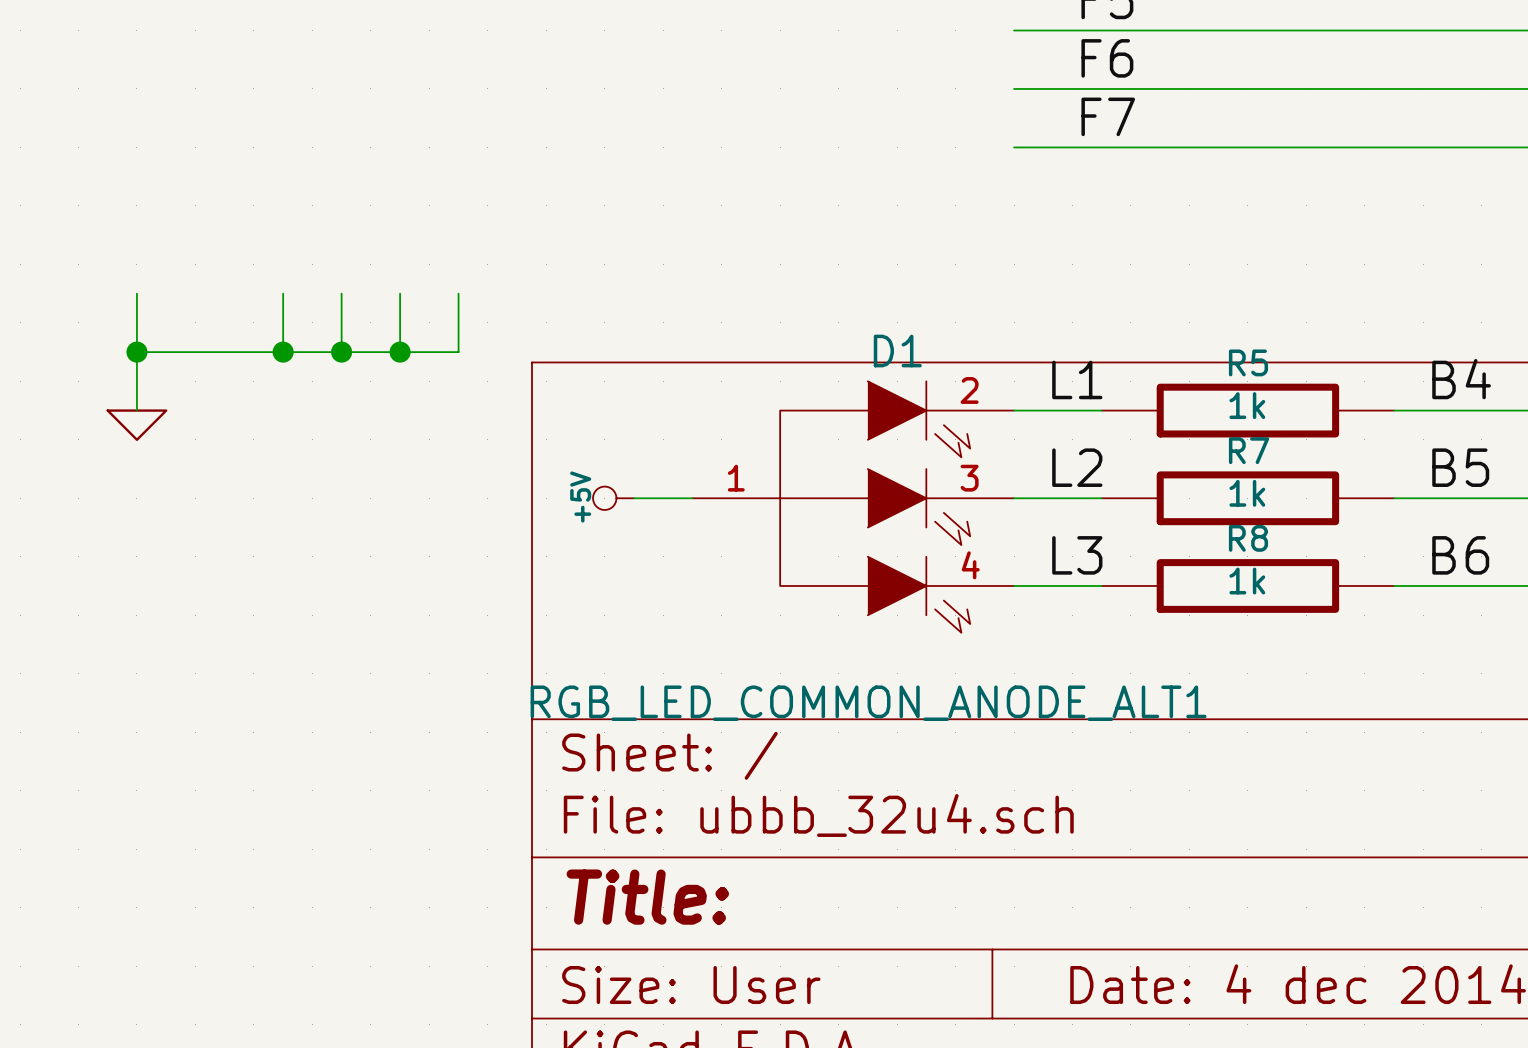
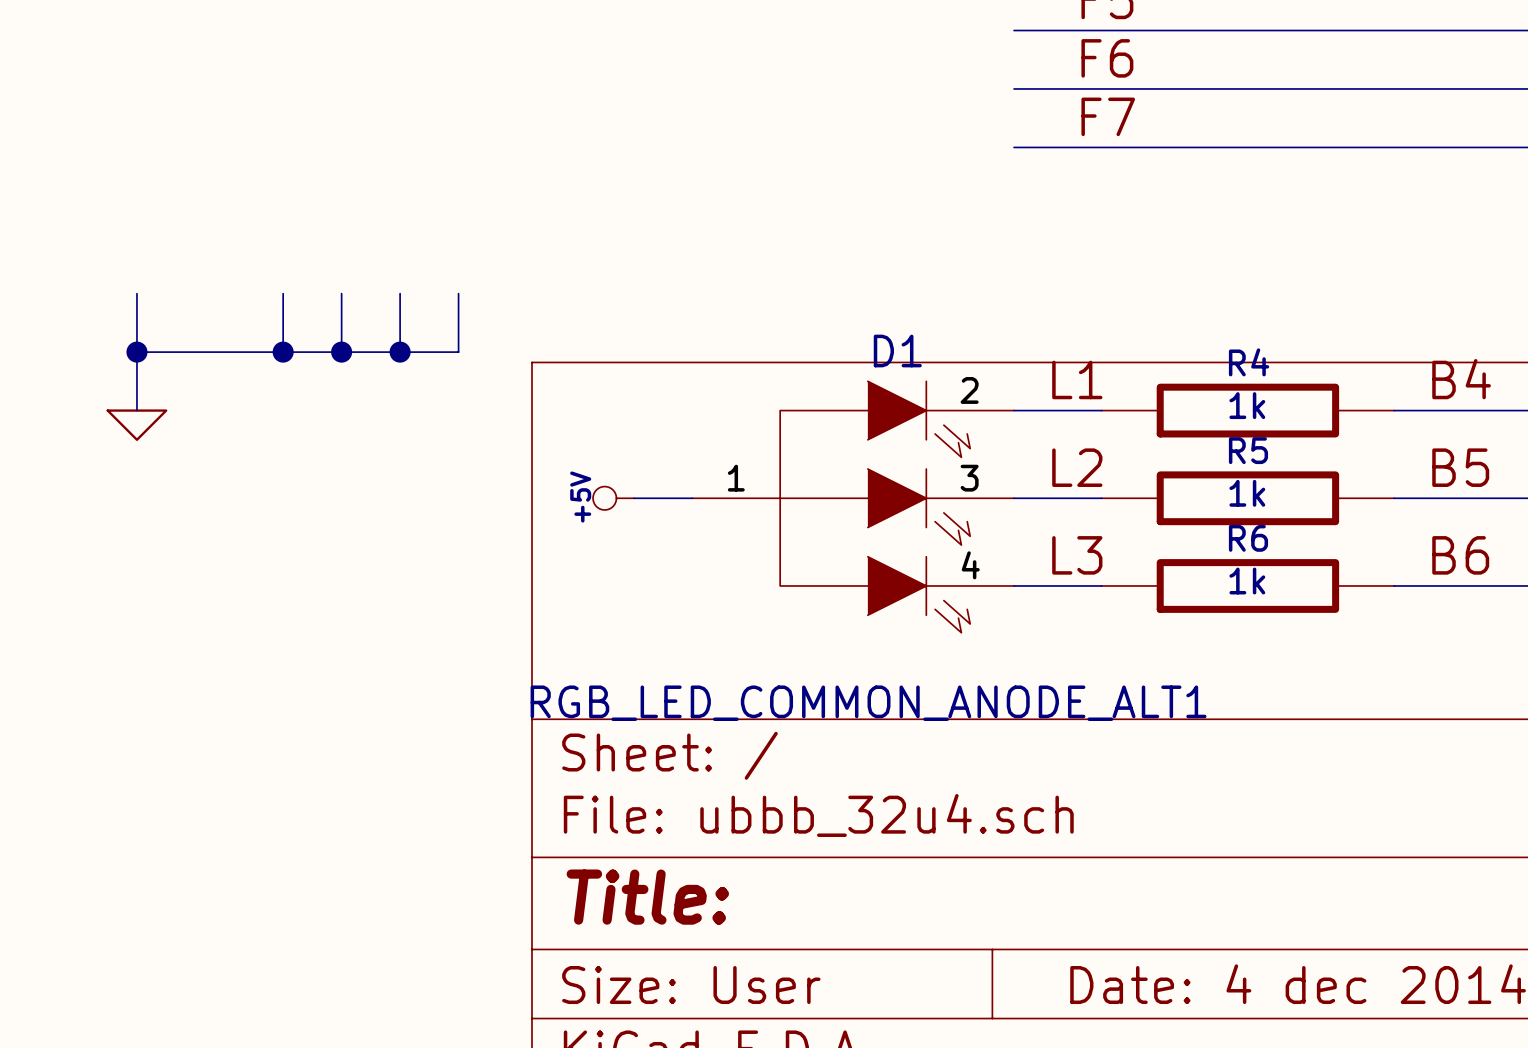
R5 name: R5 (1248, 362) -> R4 (1249, 362)
R7 name: R7 (1249, 450) -> R5 (1248, 450)
R8 name: R8 (1248, 538) -> R6 (1248, 538)

